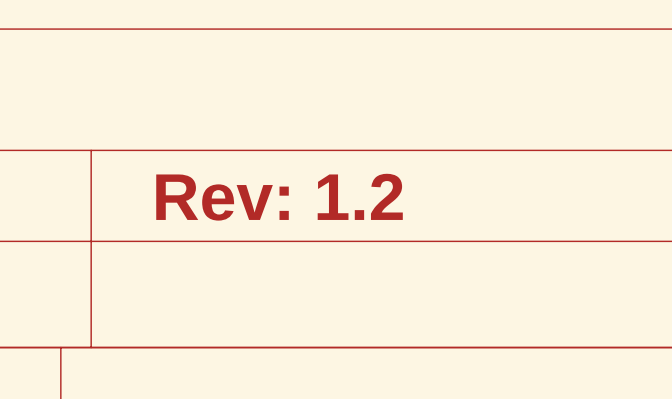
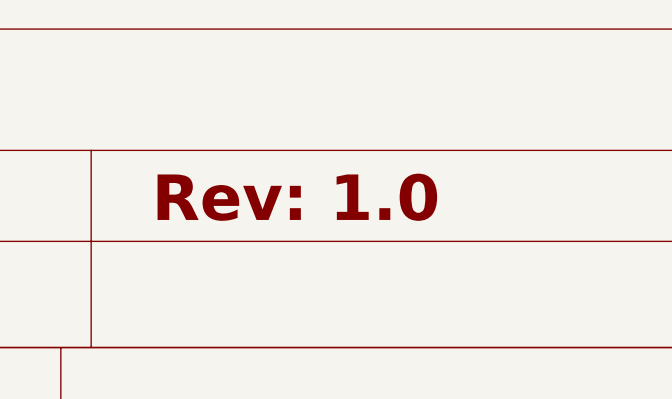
title block: Rev: 1.2 (279, 197) -> Rev: 1.0 (297, 197)

